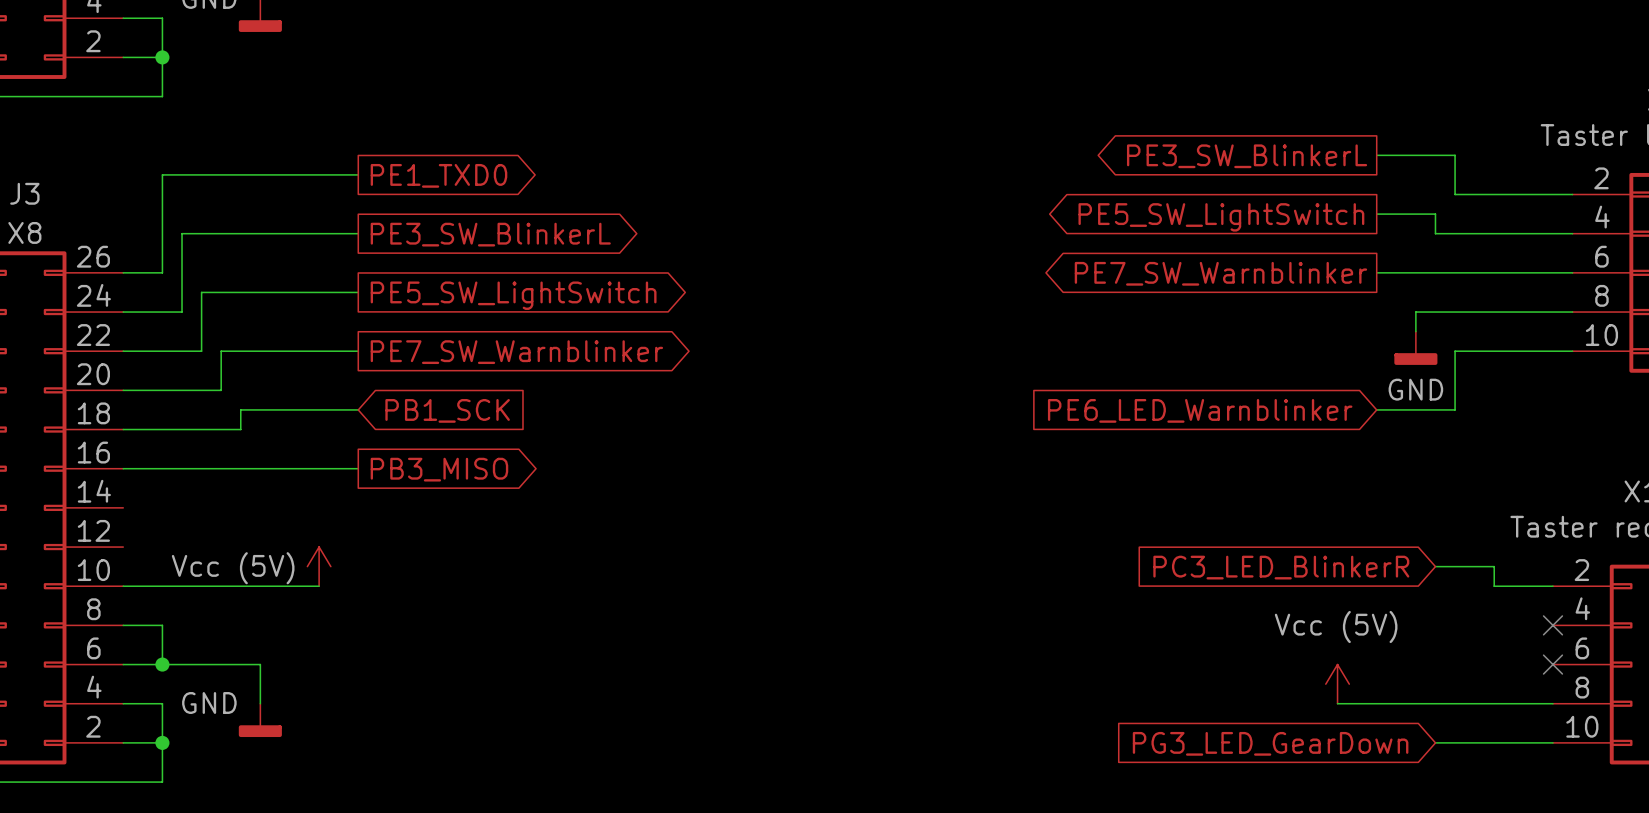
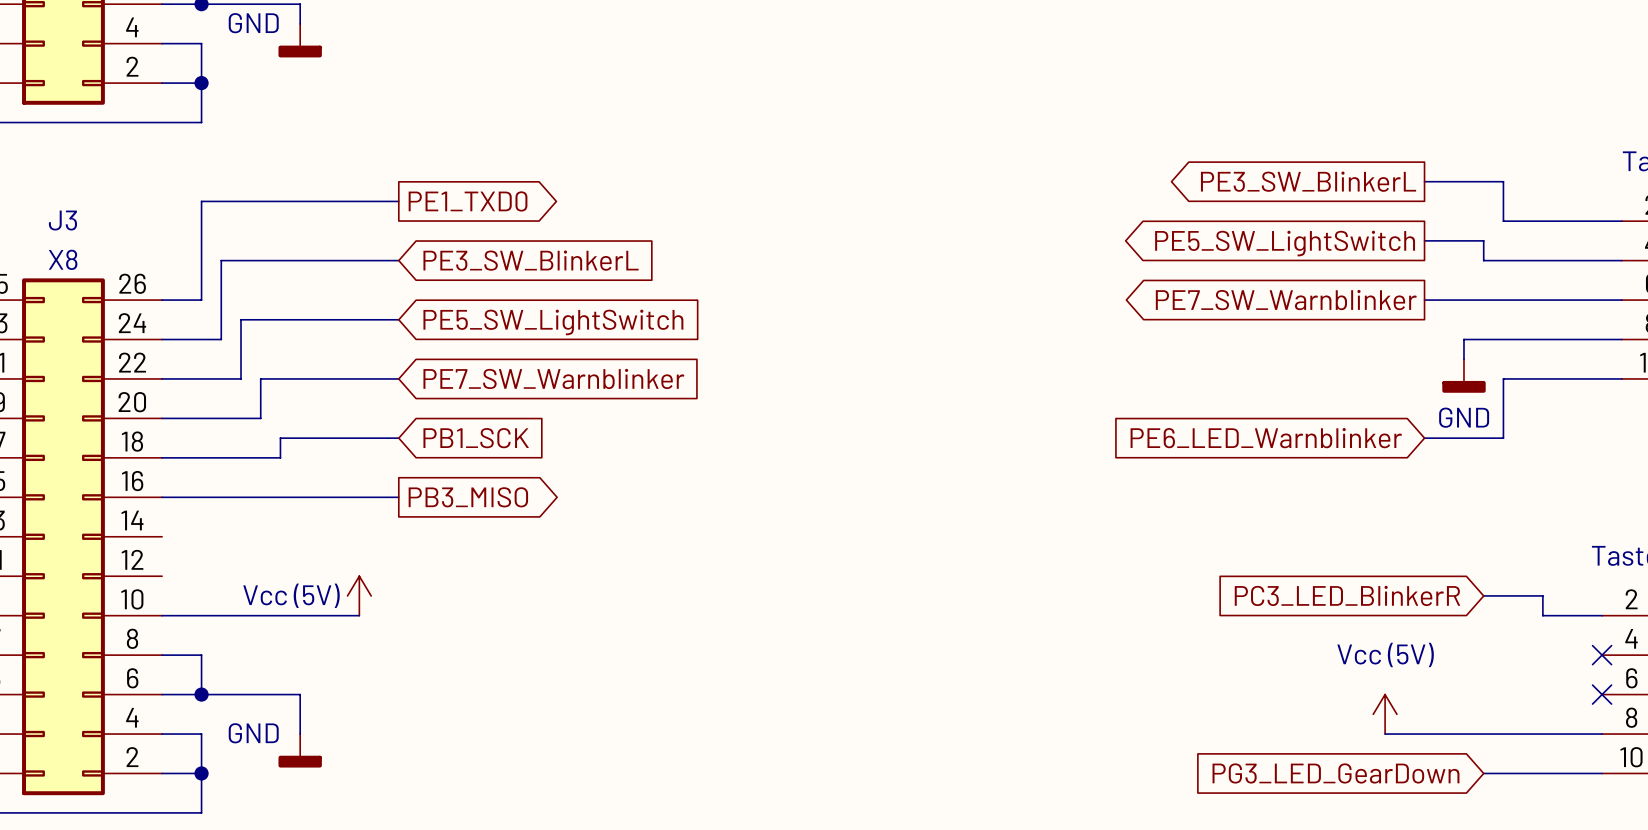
global label shape: output (490, 234) -> input (531, 260)
global label shape: output (513, 295) -> input (553, 322)
global label shape: output (516, 352) -> input (553, 378)

